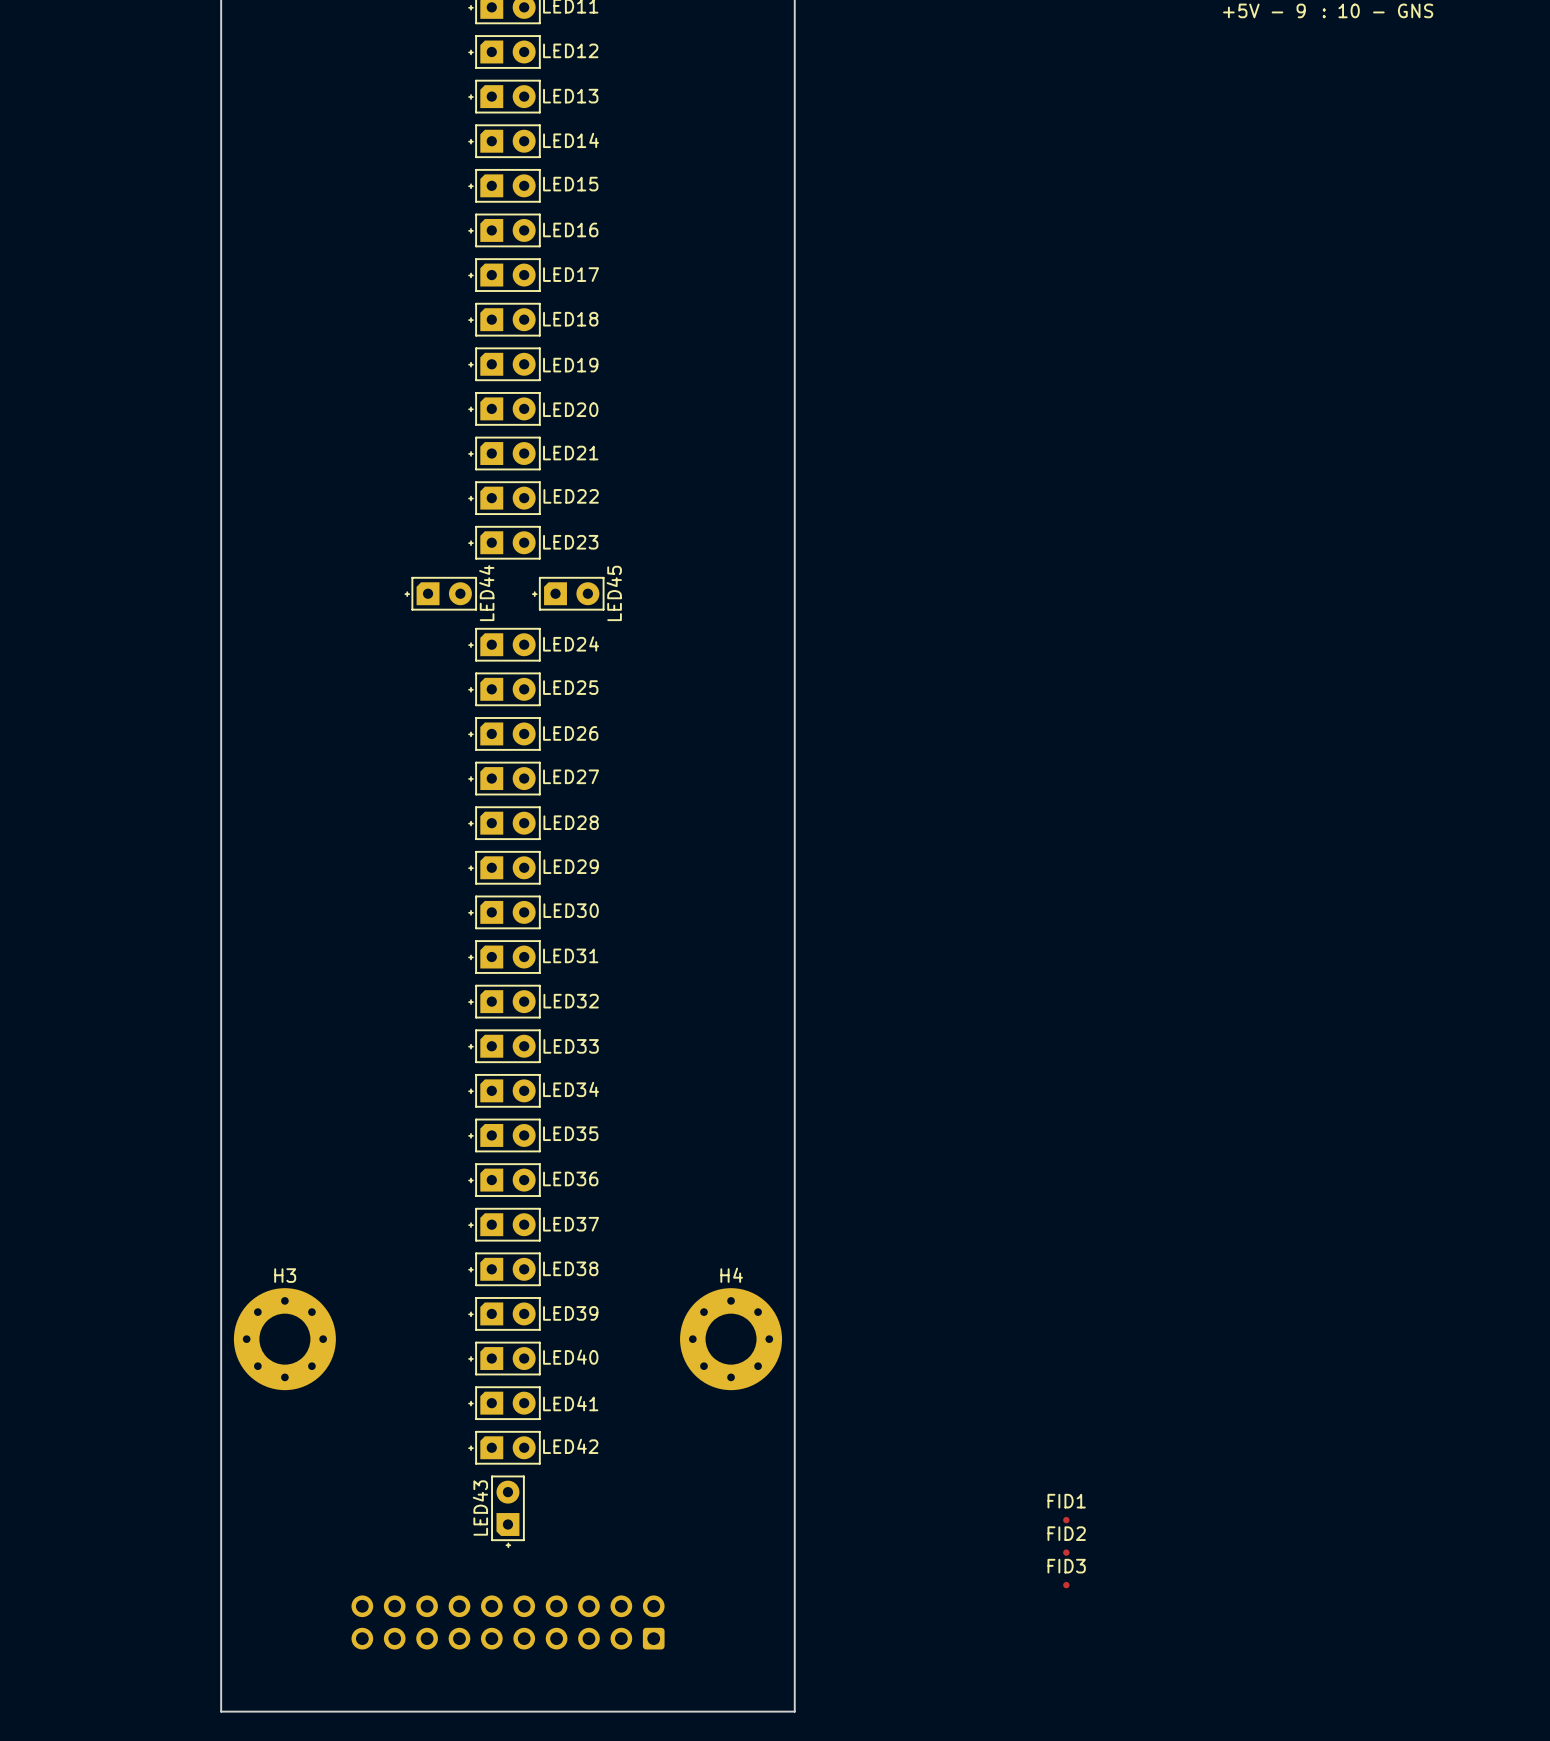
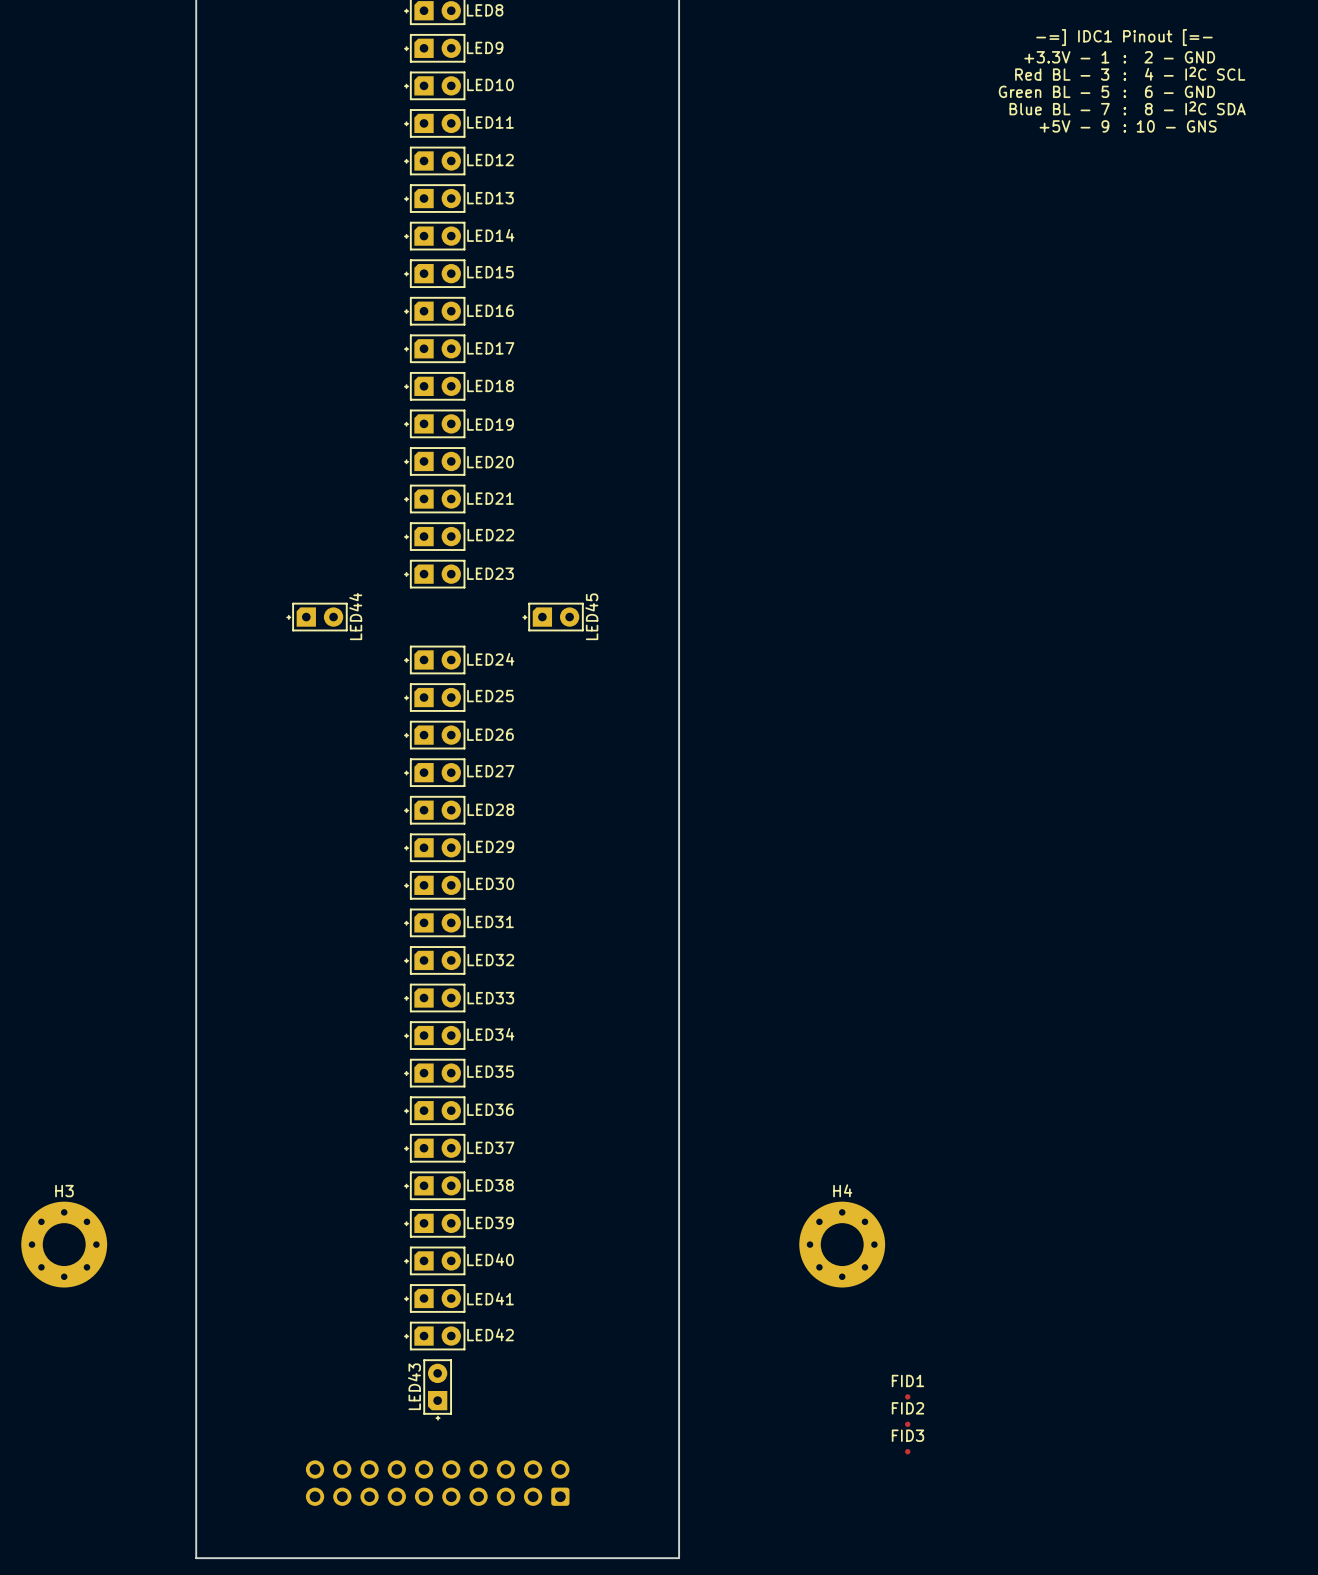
LED44 position: (444, 593) -> (319, 617)
LED45 position: (571, 593) -> (556, 617)
H3 position: (284, 1339) -> (64, 1244)
H4 position: (731, 1339) -> (842, 1244)

